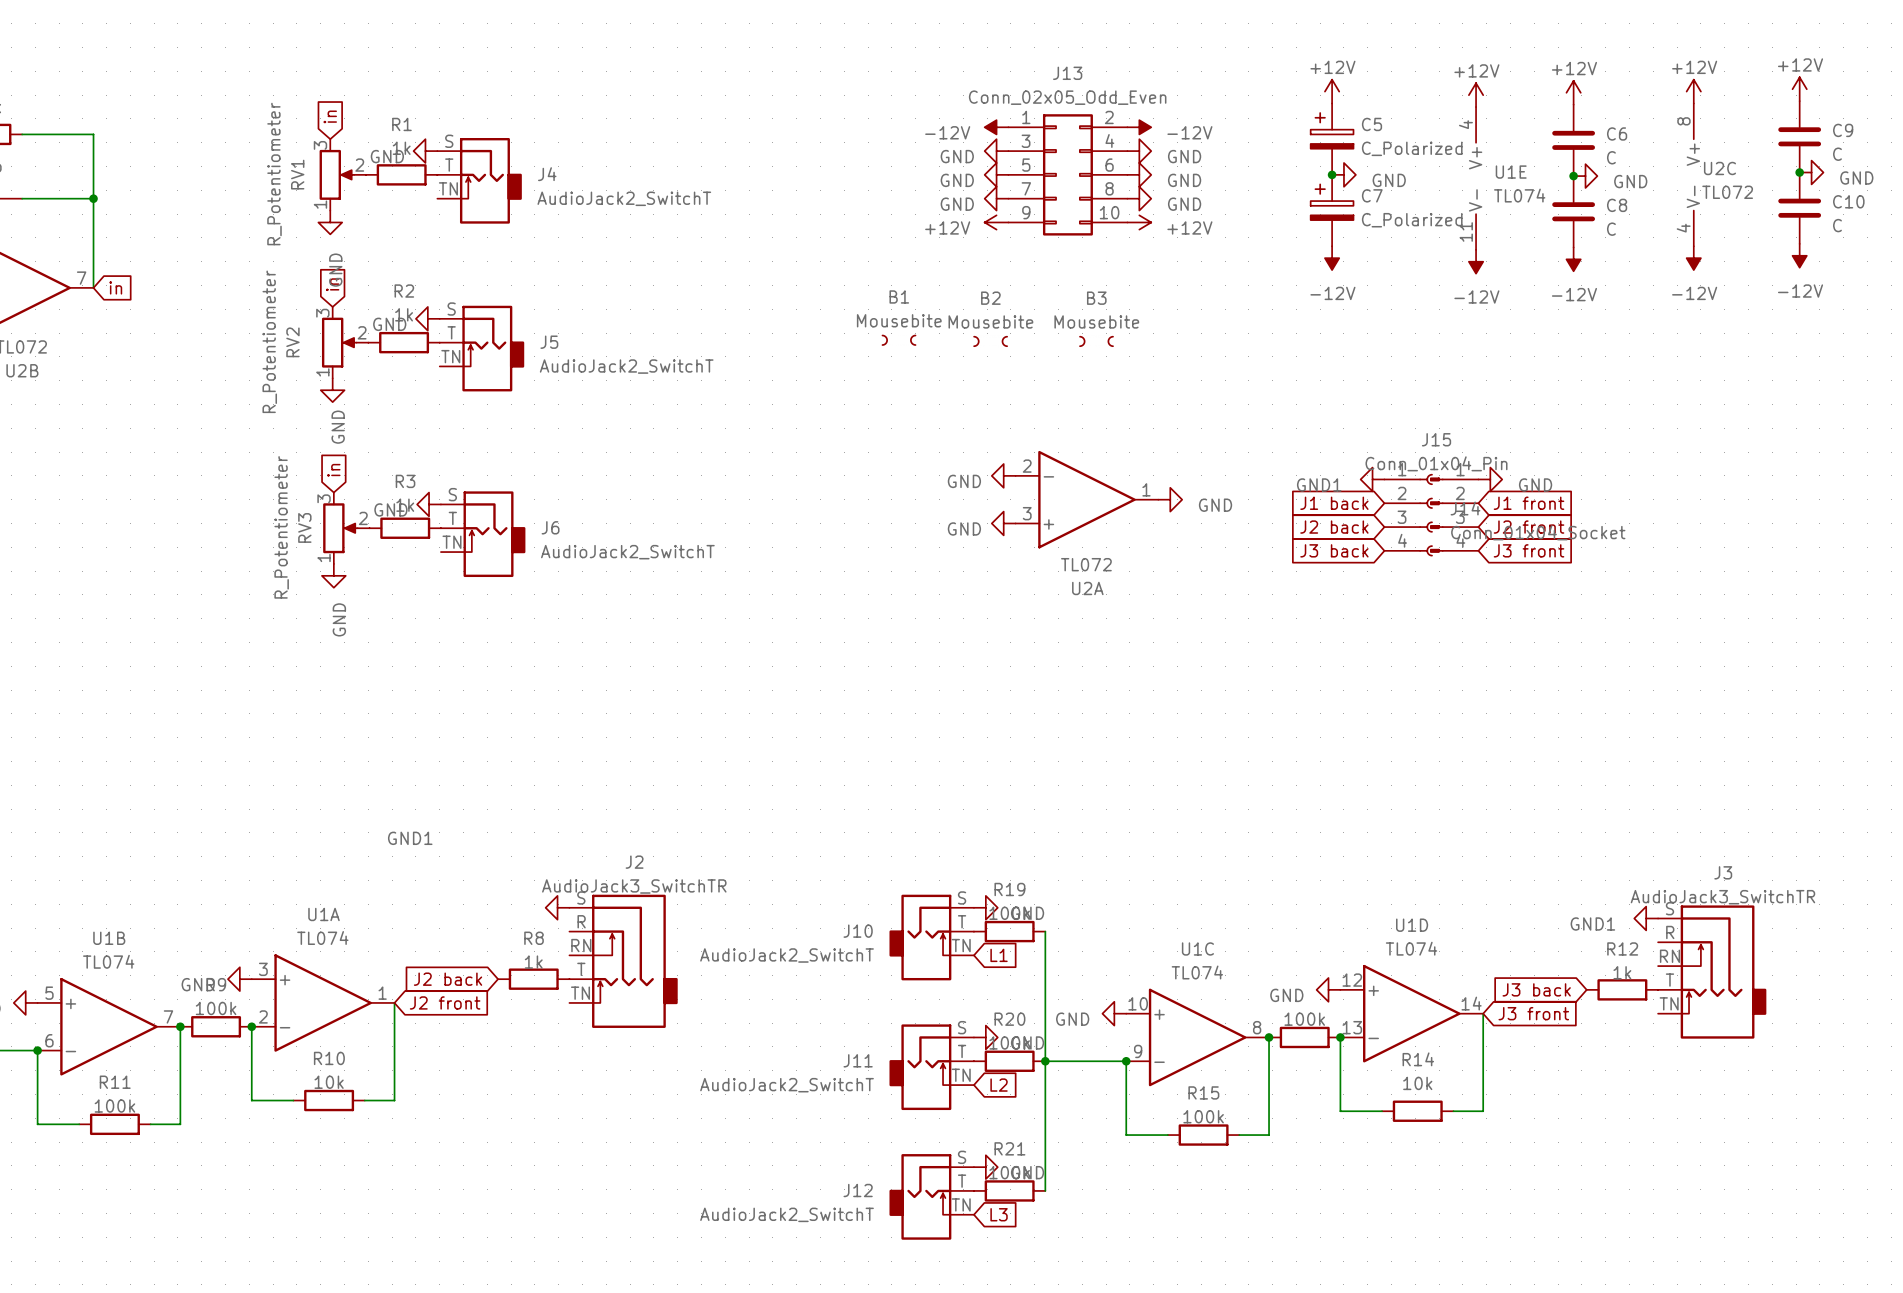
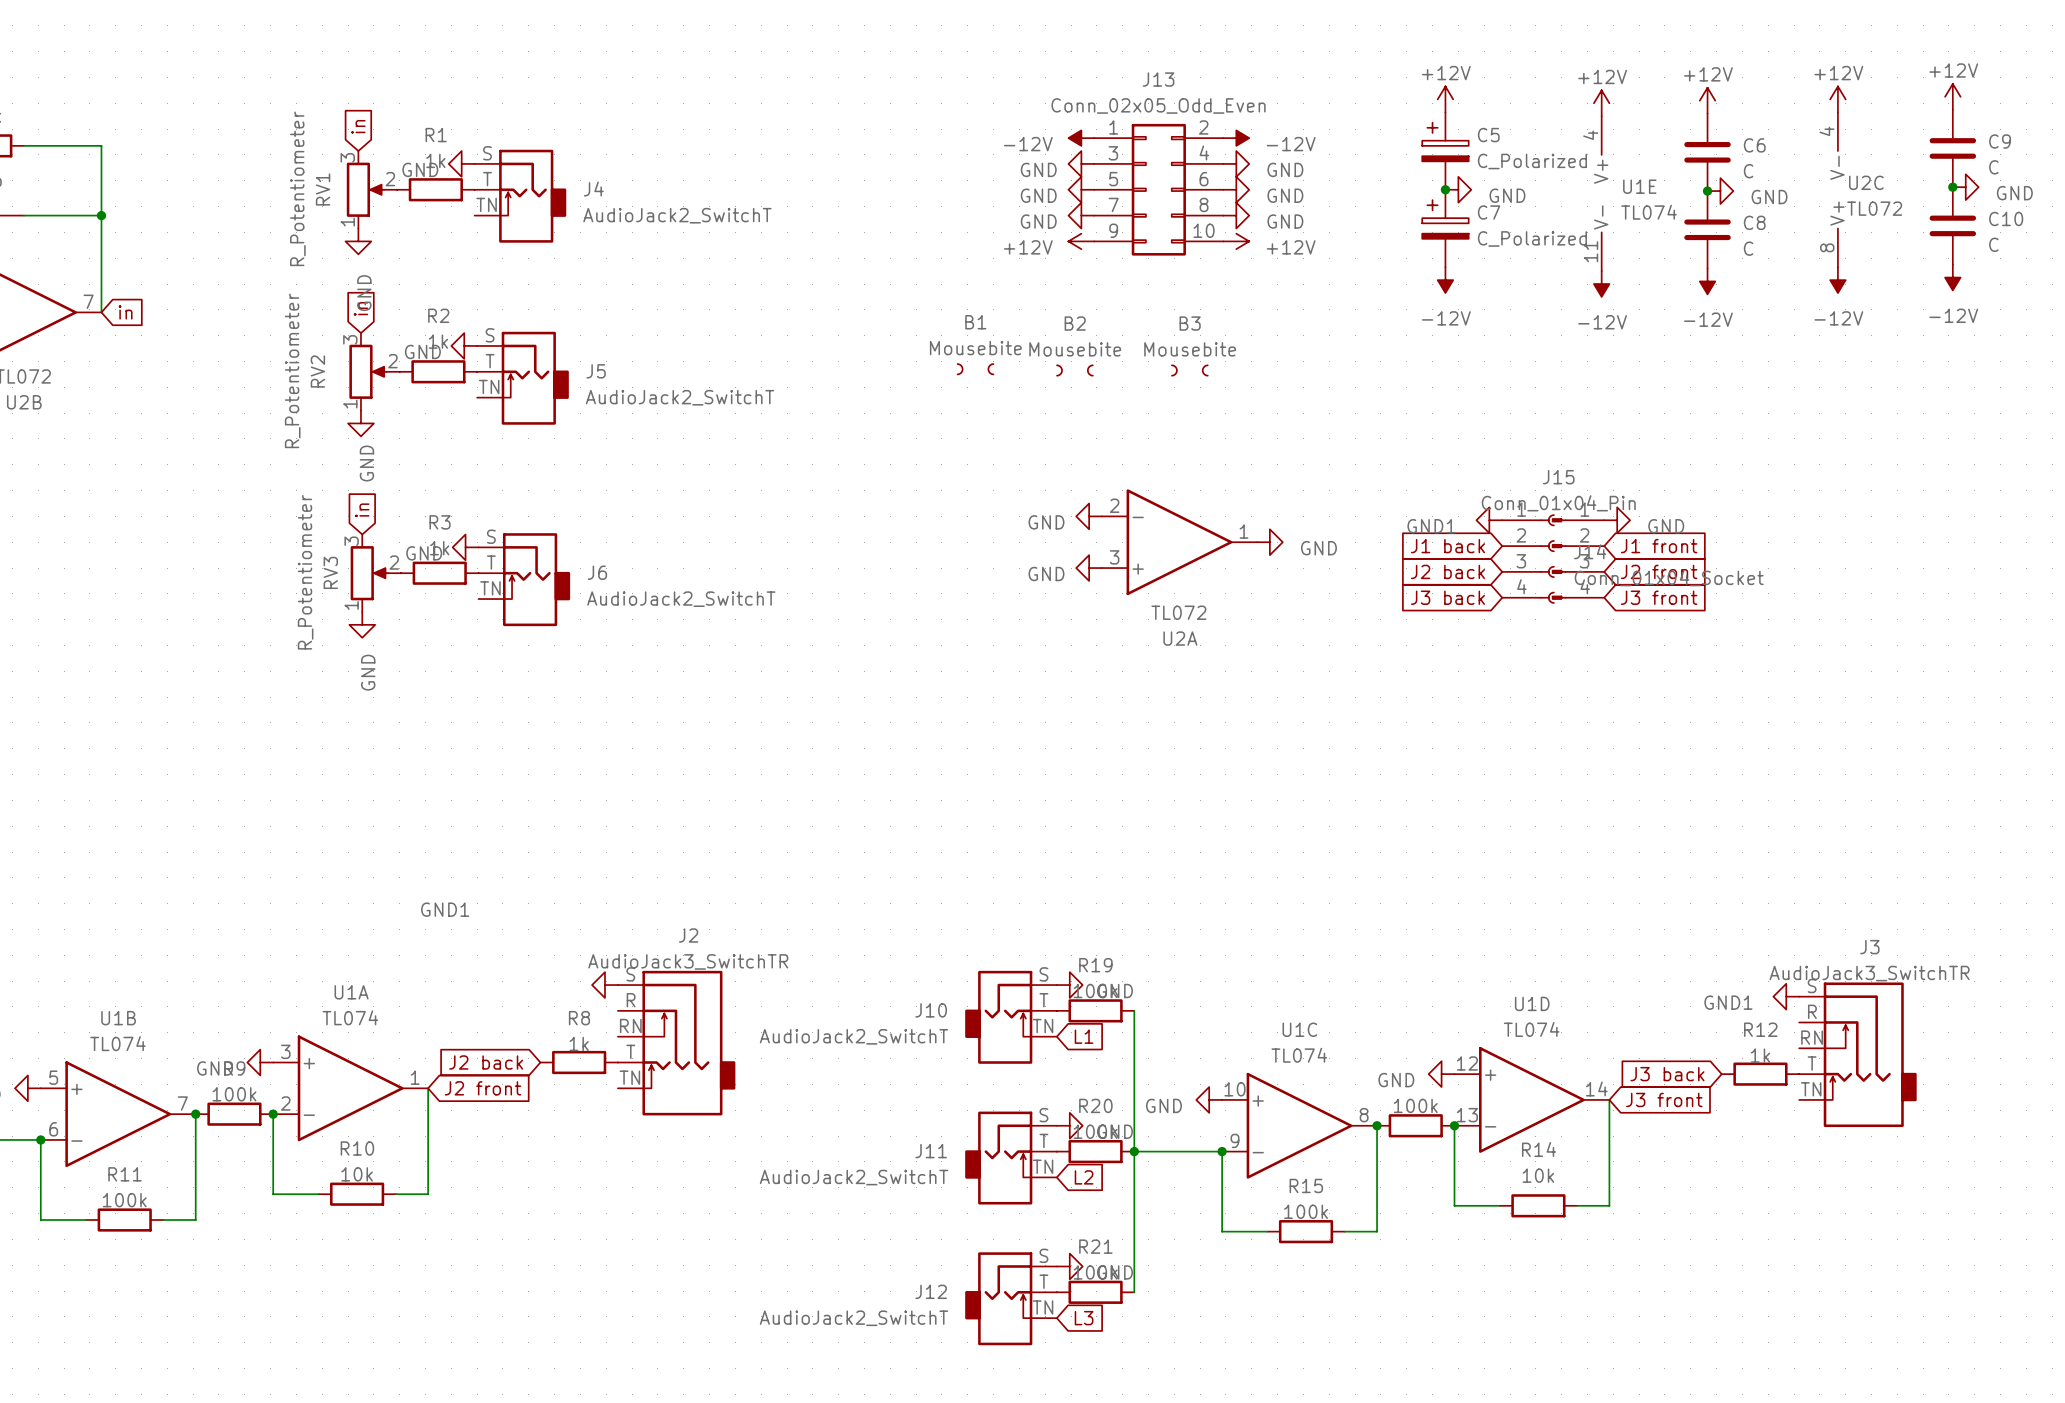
U2C rotation: 0° (1693, 174) -> 180° (1837, 189)

